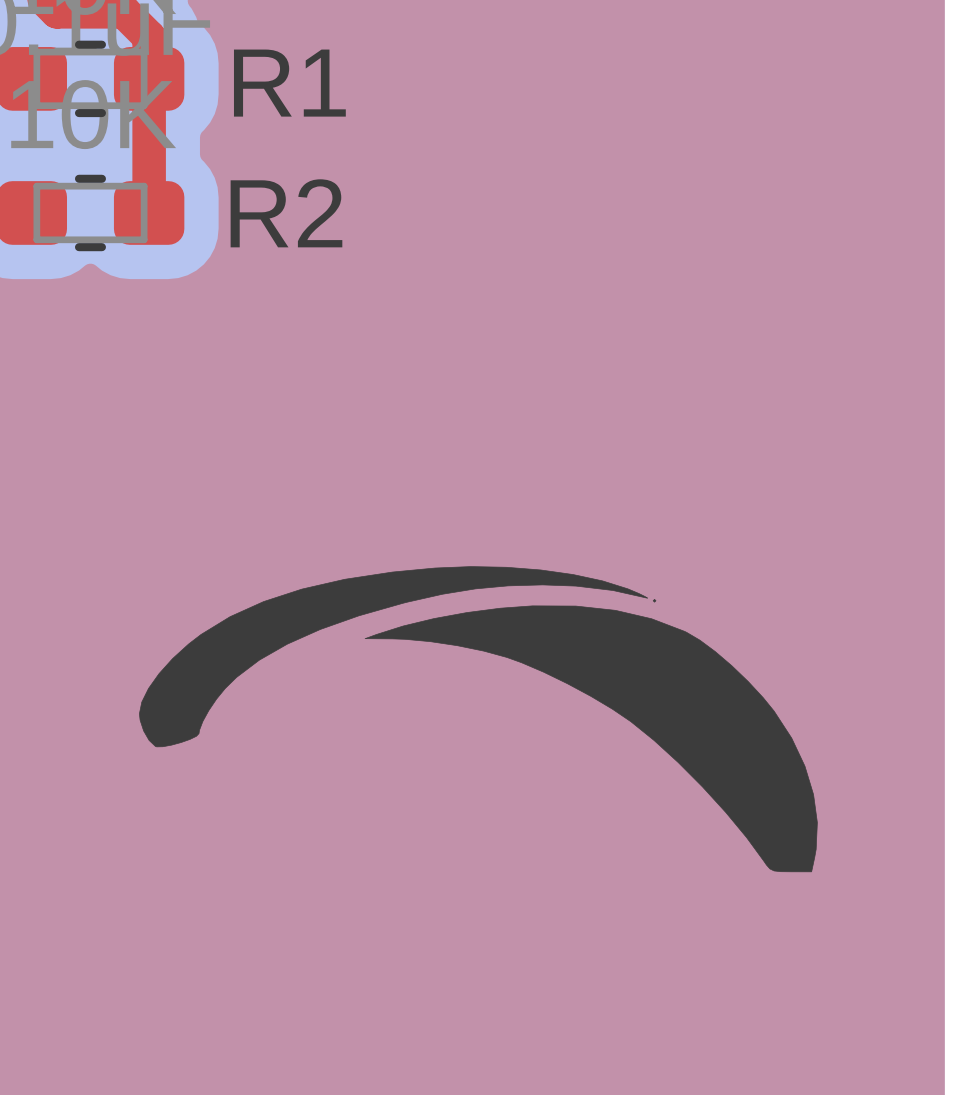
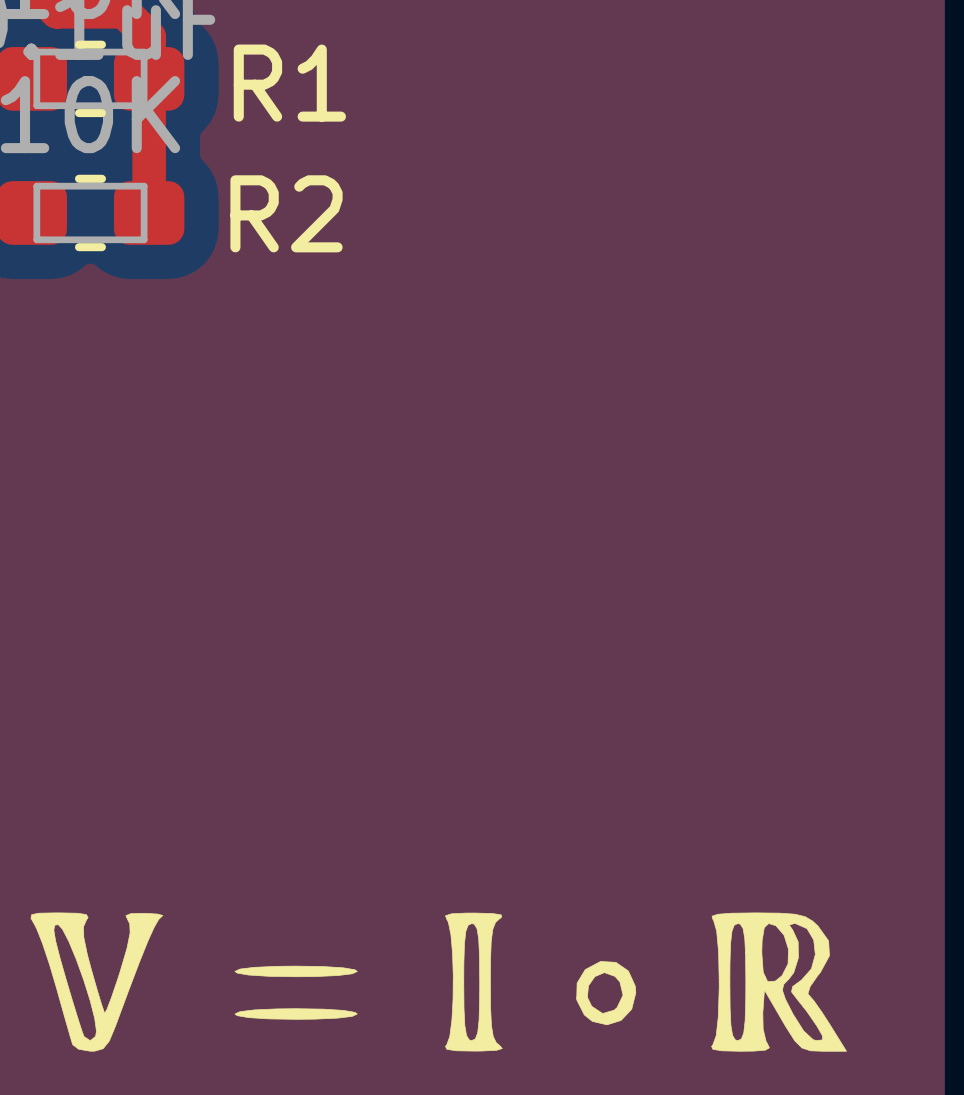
drawing: [139, 566, 818, 873] -> none
drawing: none -> [30, 912, 847, 1052]

